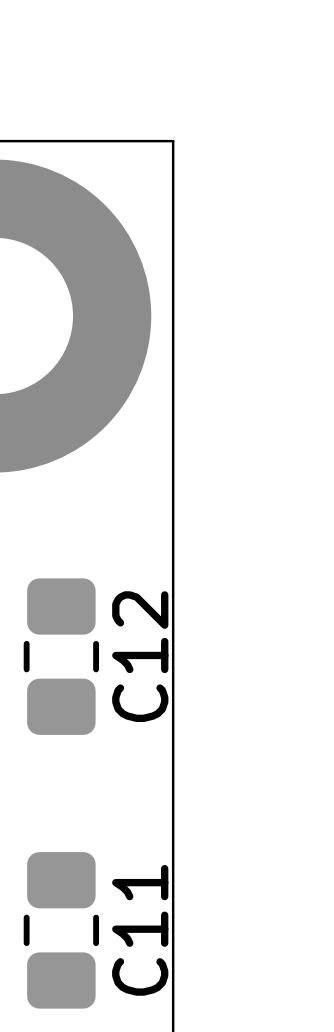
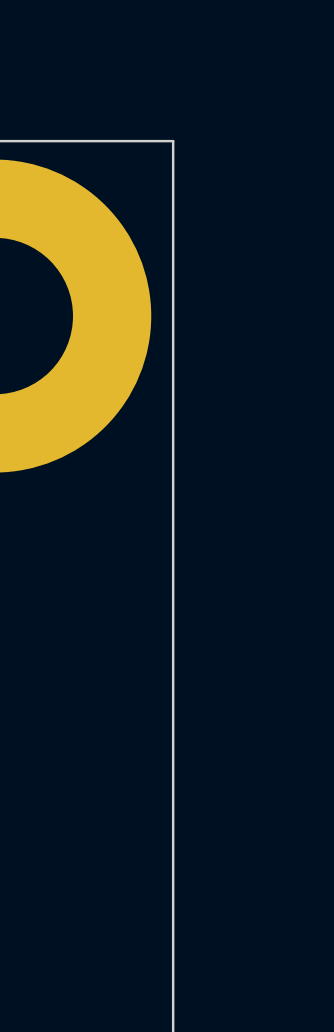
C12: (61, 656) -> none
C11: (61, 930) -> none

